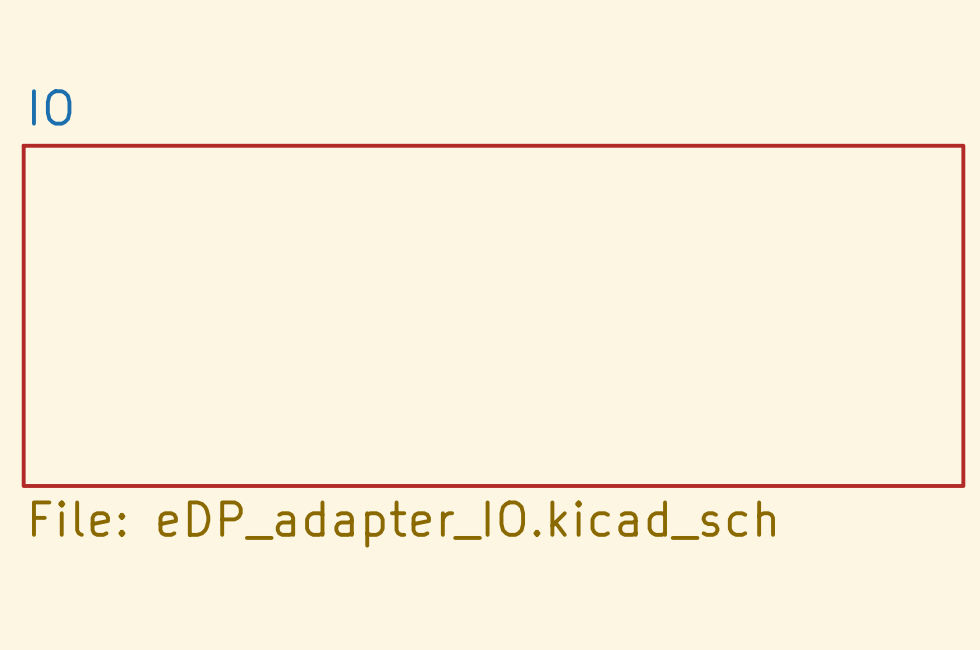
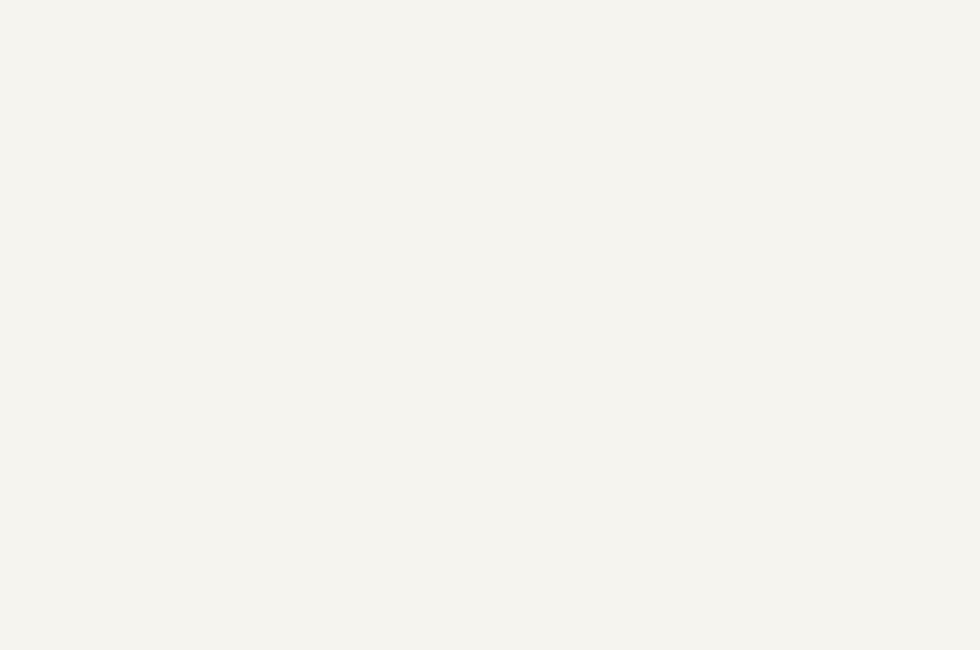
sheet IO: File: eDP_adapter_IO.kicad_sch (493, 315) -> none

